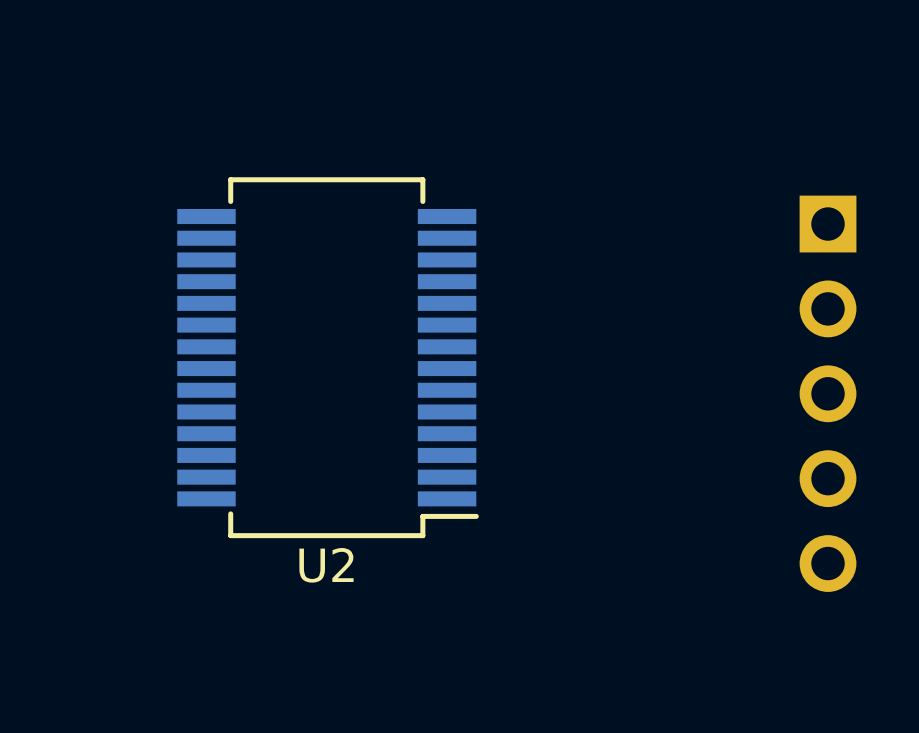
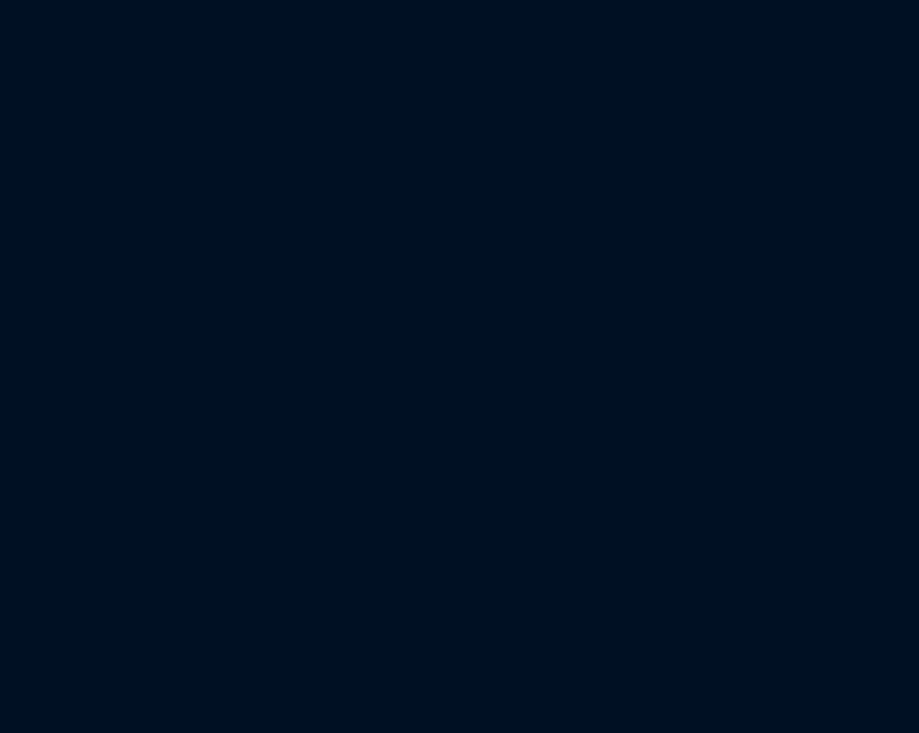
U2: (328, 357) -> none
part: (828, 393) -> none

